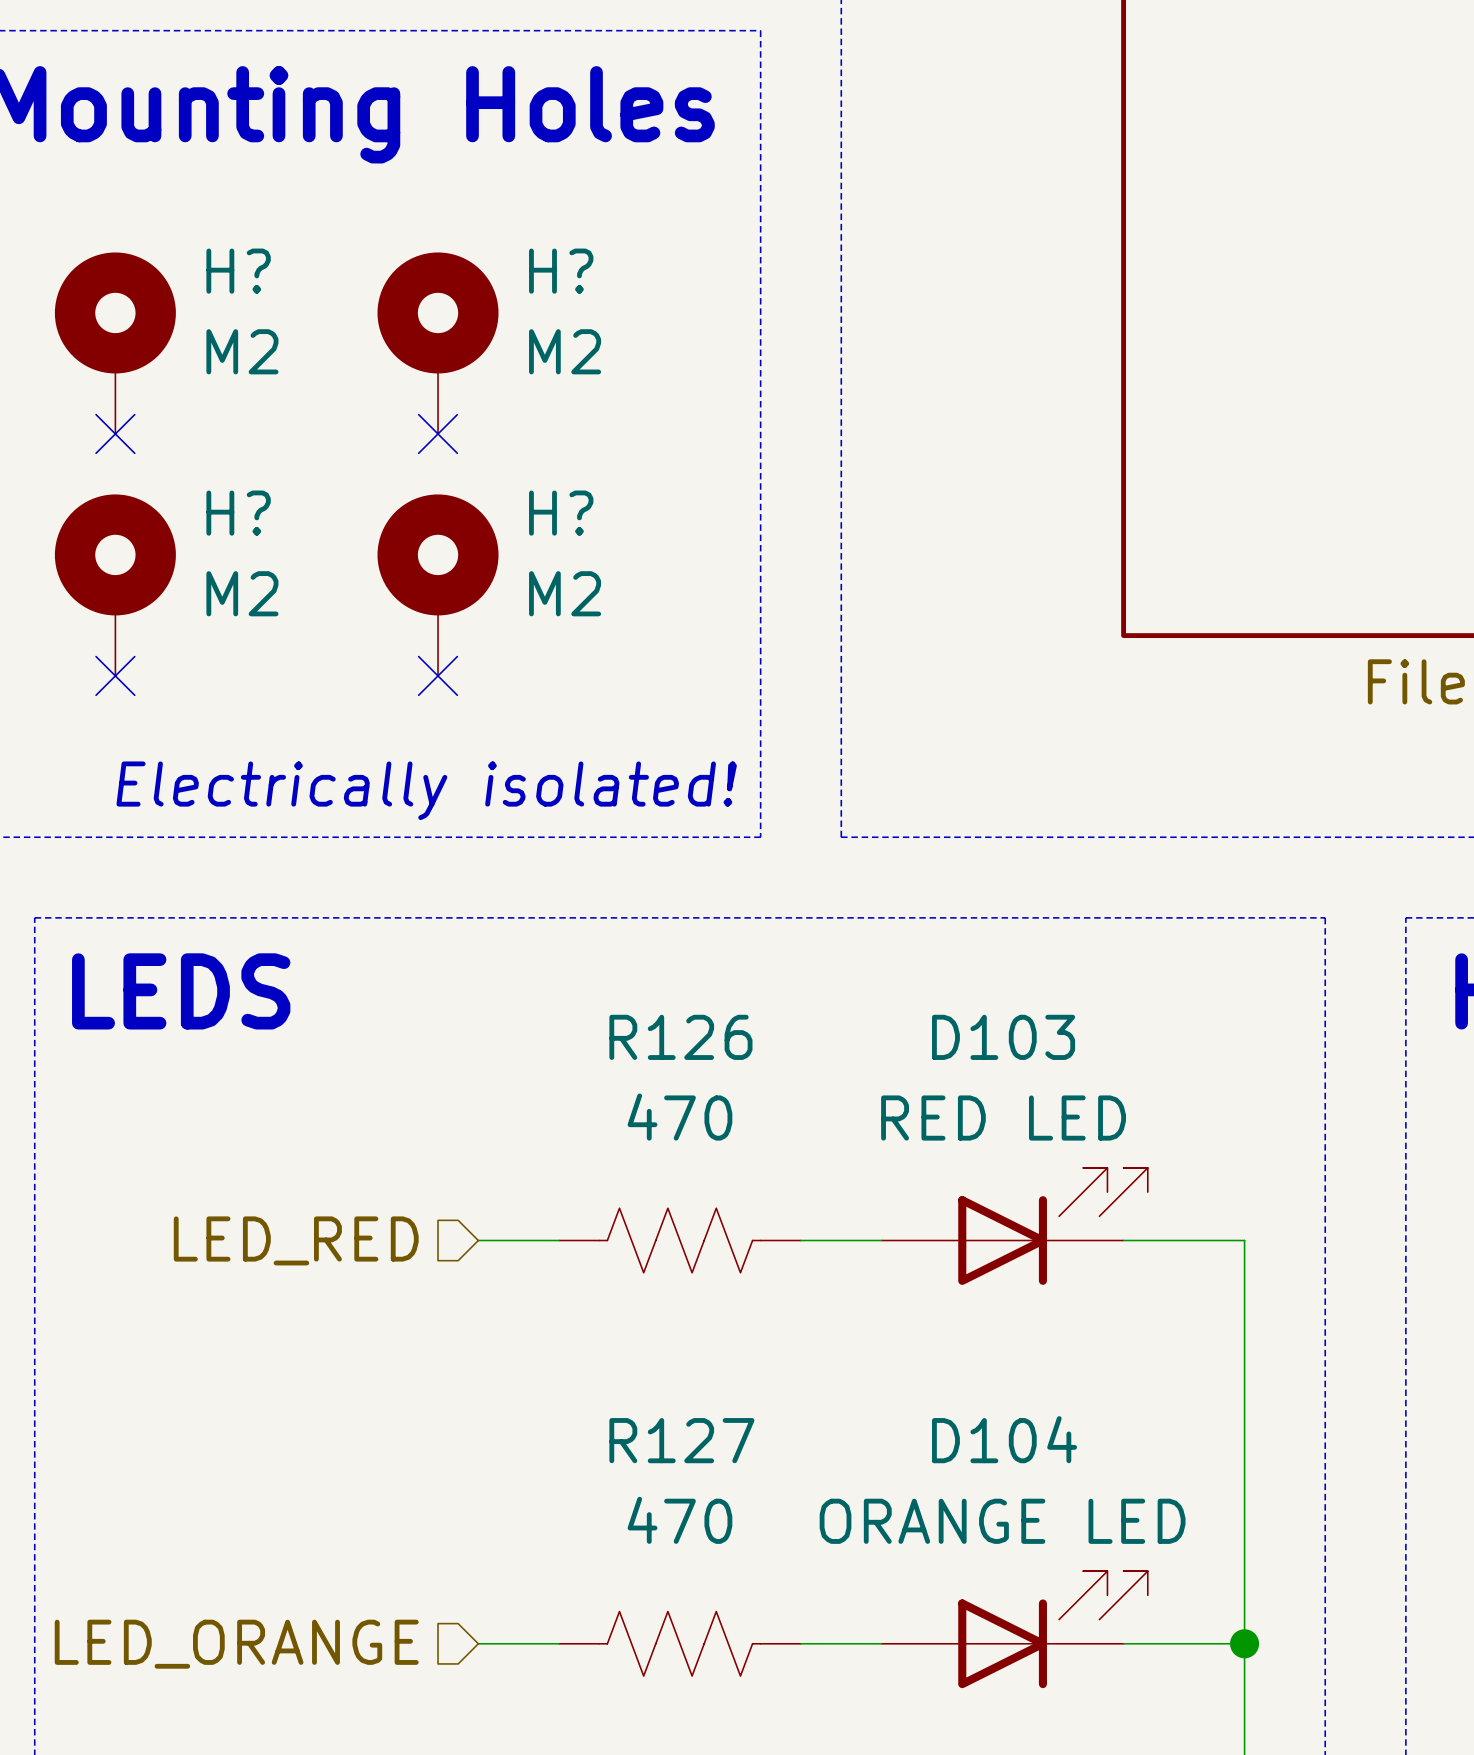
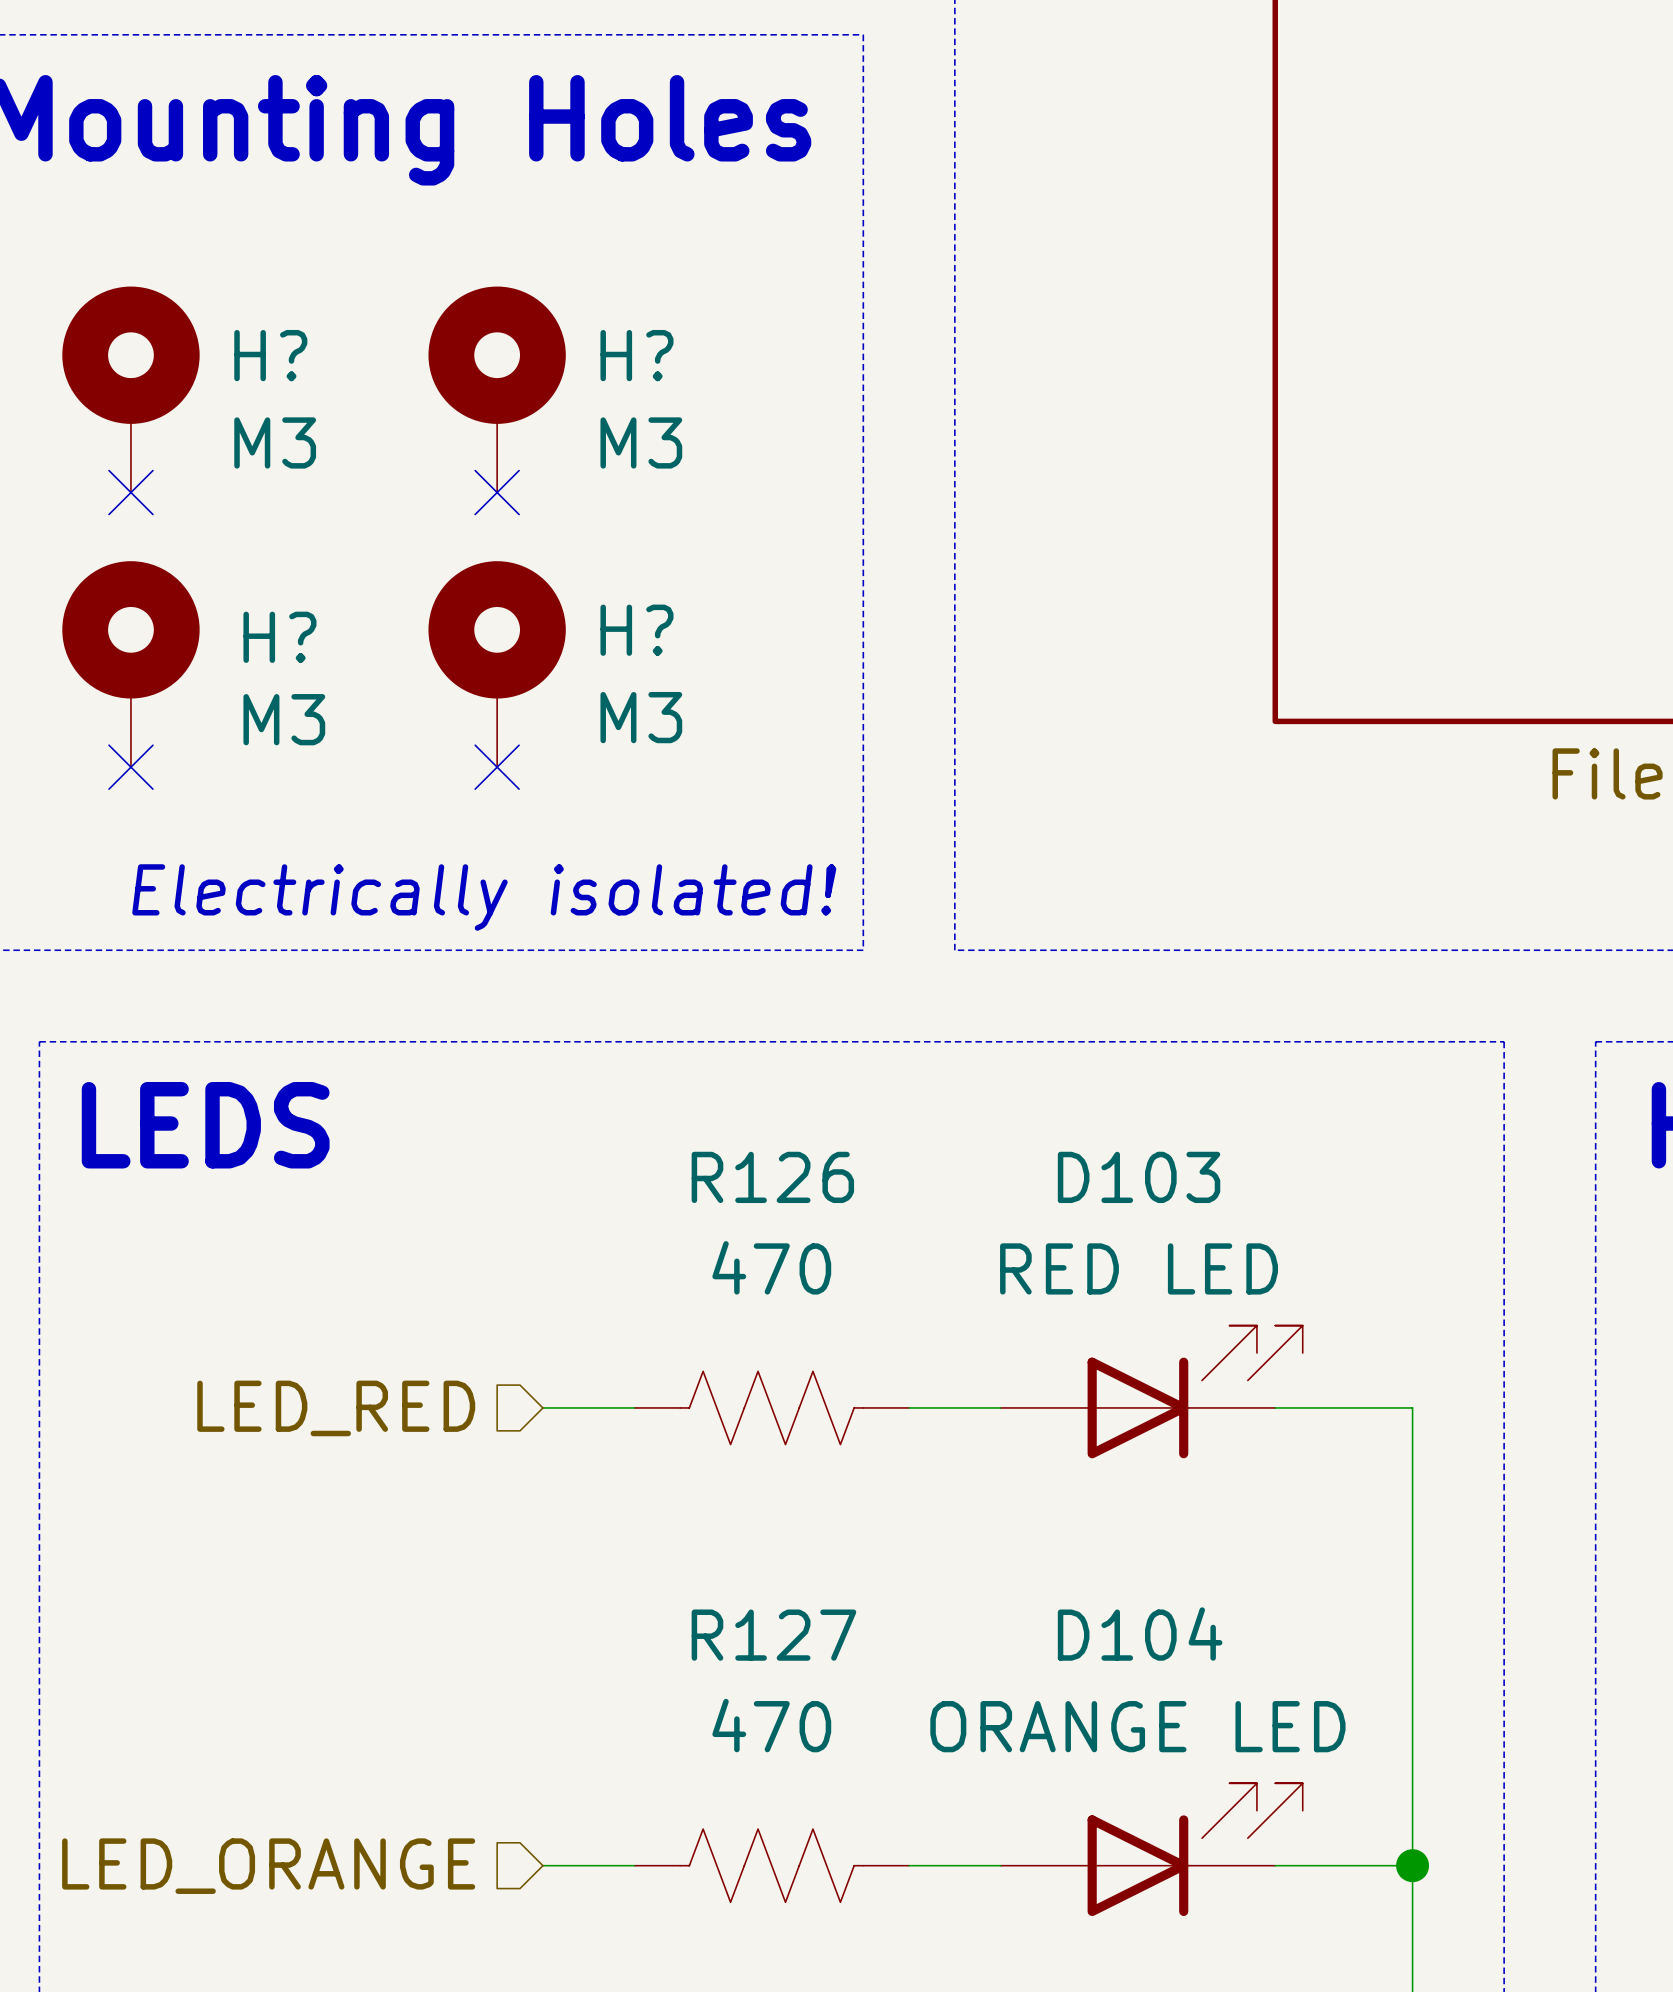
H? name position: H? (238, 271) -> H? (270, 355)
H? name position: H? (561, 271) -> H? (636, 355)
H? value: M2 (242, 351) -> M3 (275, 442)
H? value: M2 (565, 351) -> M3 (641, 442)
H? name position: H? (238, 513) -> H? (279, 637)
H? name position: H? (561, 513) -> H? (636, 630)
H? value: M2 (242, 593) -> M3 (284, 719)
H? value: M2 (565, 593) -> M3 (641, 717)

